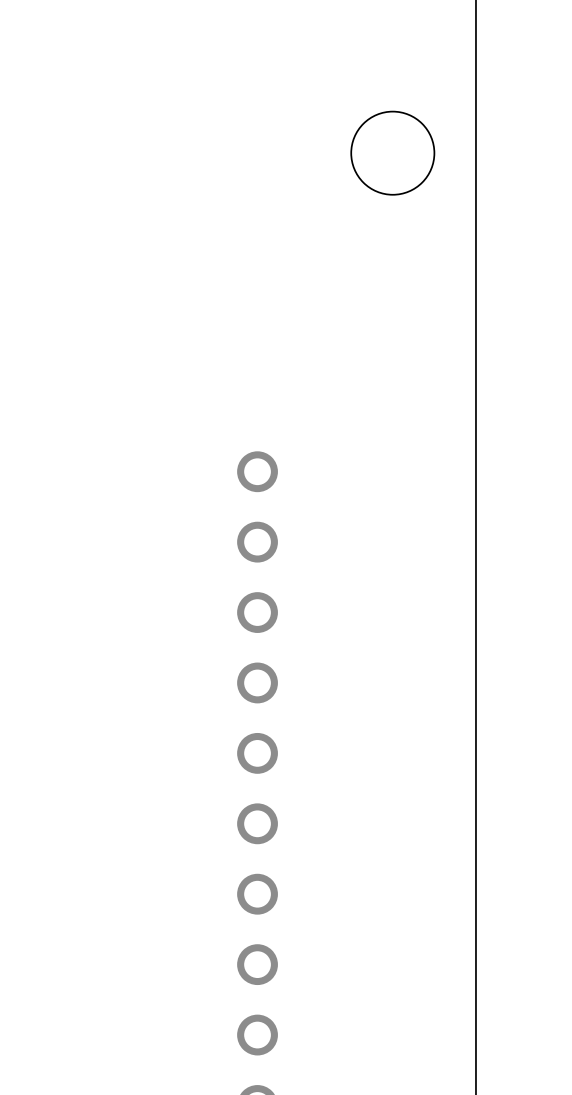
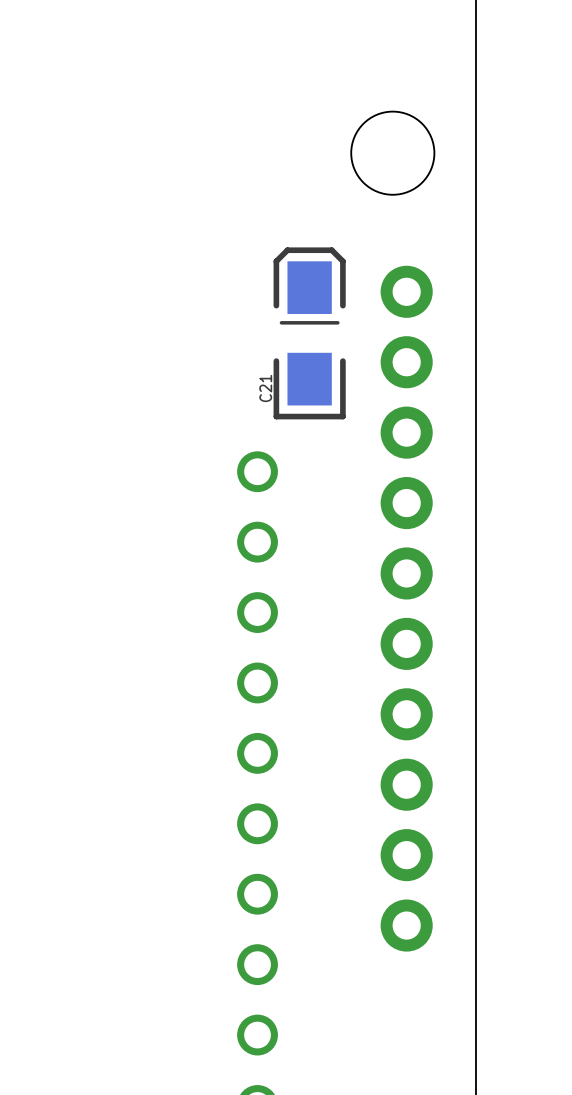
C21: none -> (309, 333)
part: none -> (406, 608)

